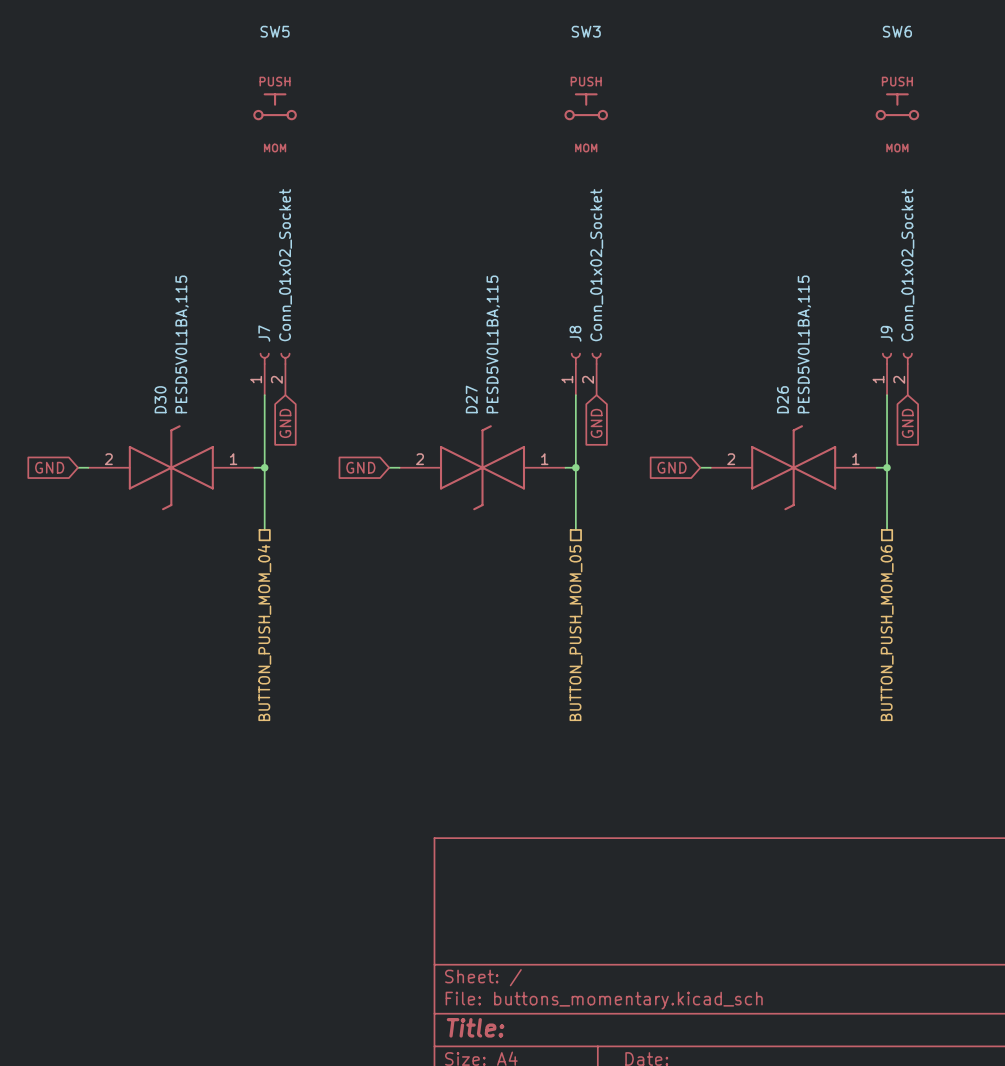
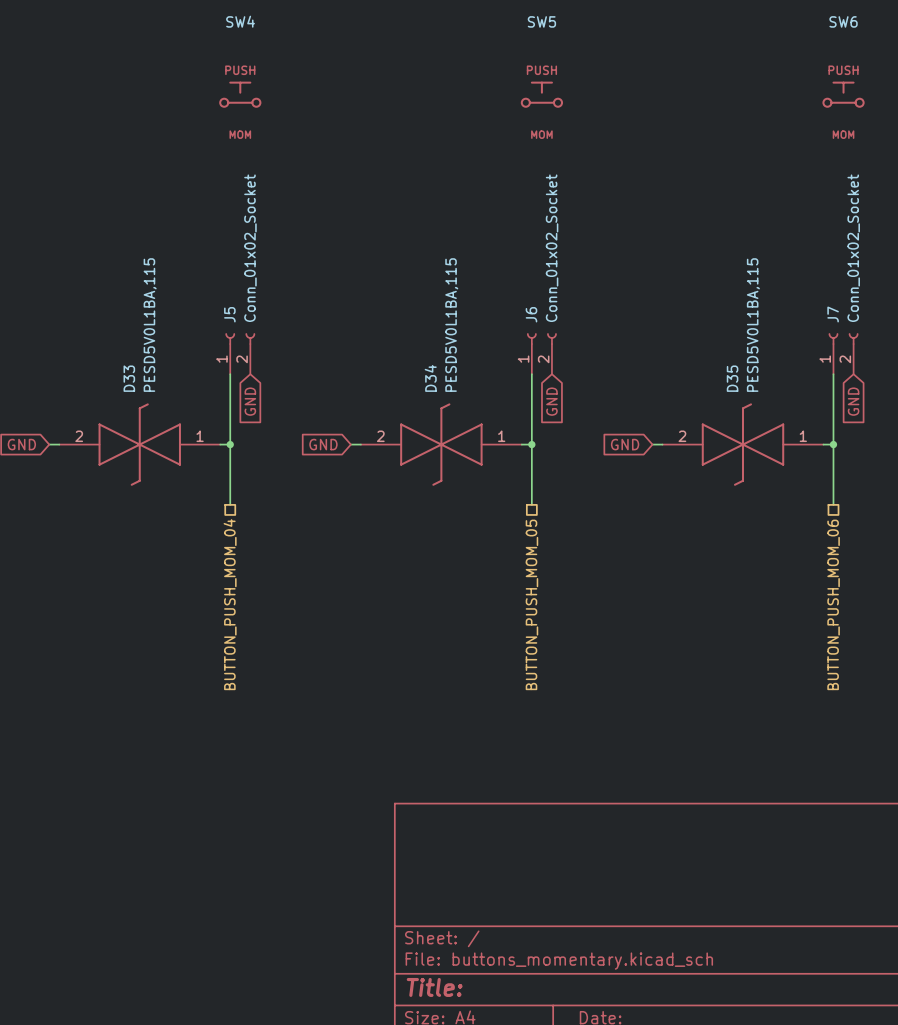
SW5 name: SW5 (275, 31) -> SW4 (240, 21)
SW3 name: SW3 (586, 31) -> SW5 (541, 21)
J7 name: J7 (264, 333) -> J5 (229, 314)
J8 name: J8 (575, 333) -> J6 (531, 314)
J9 name: J9 (886, 333) -> J7 (833, 314)
D30 name: D30 (160, 399) -> D33 (129, 378)
D27 name: D27 (471, 399) -> D34 (430, 378)
D26 name: D26 (782, 399) -> D35 (732, 378)

